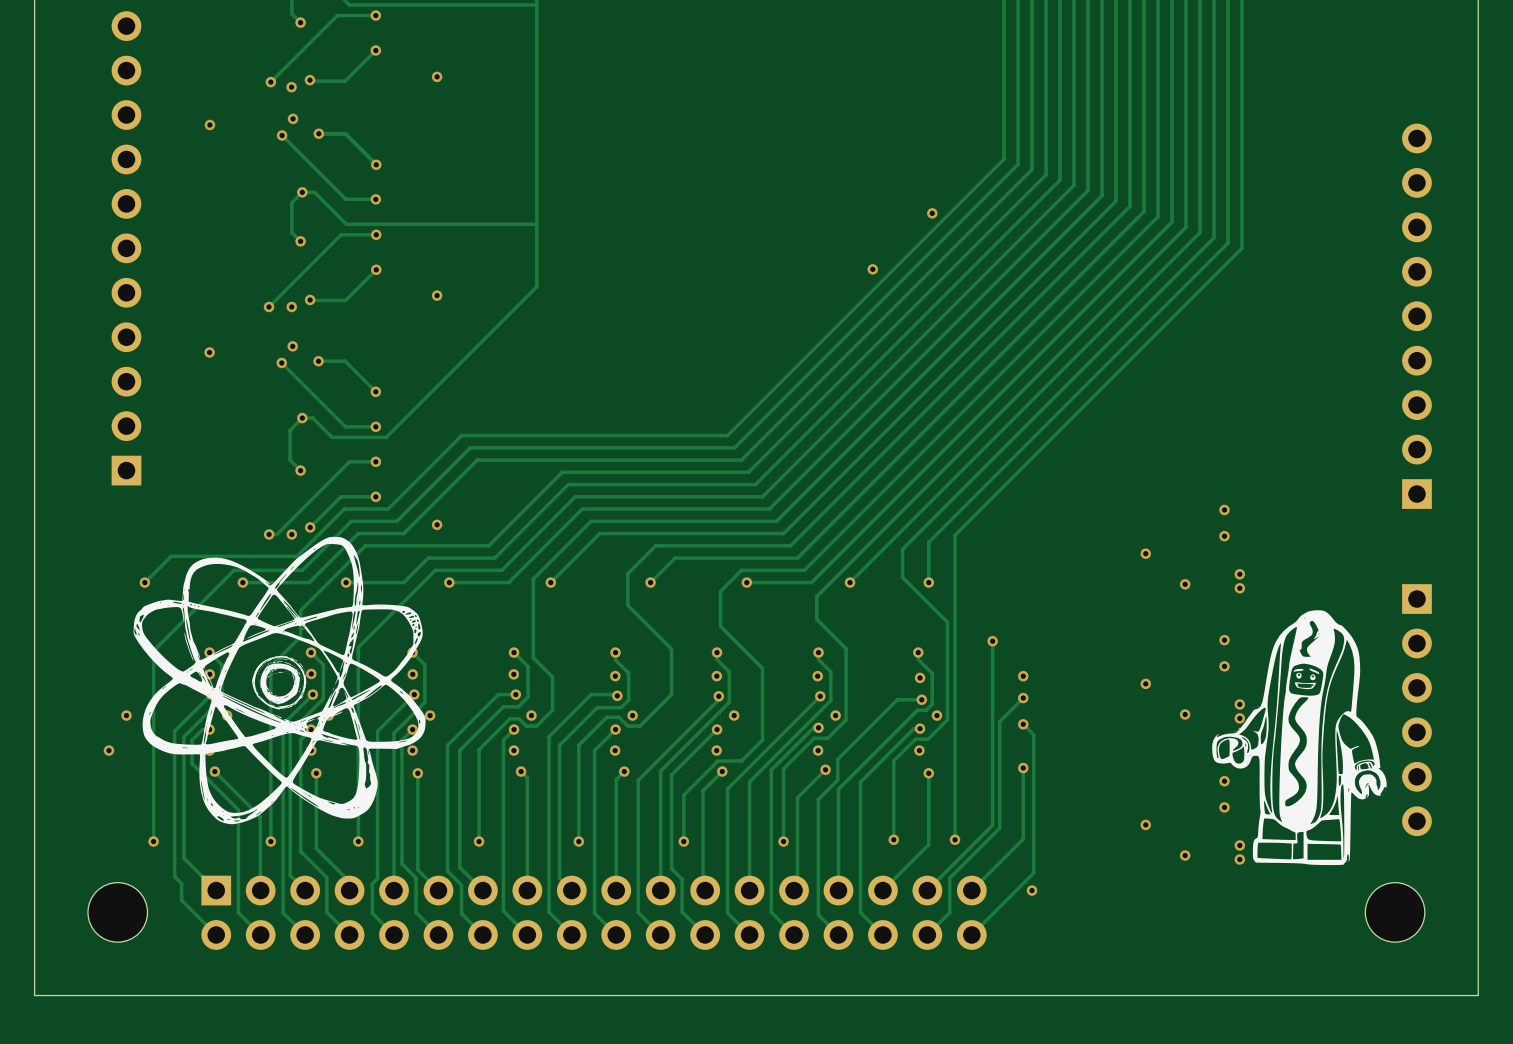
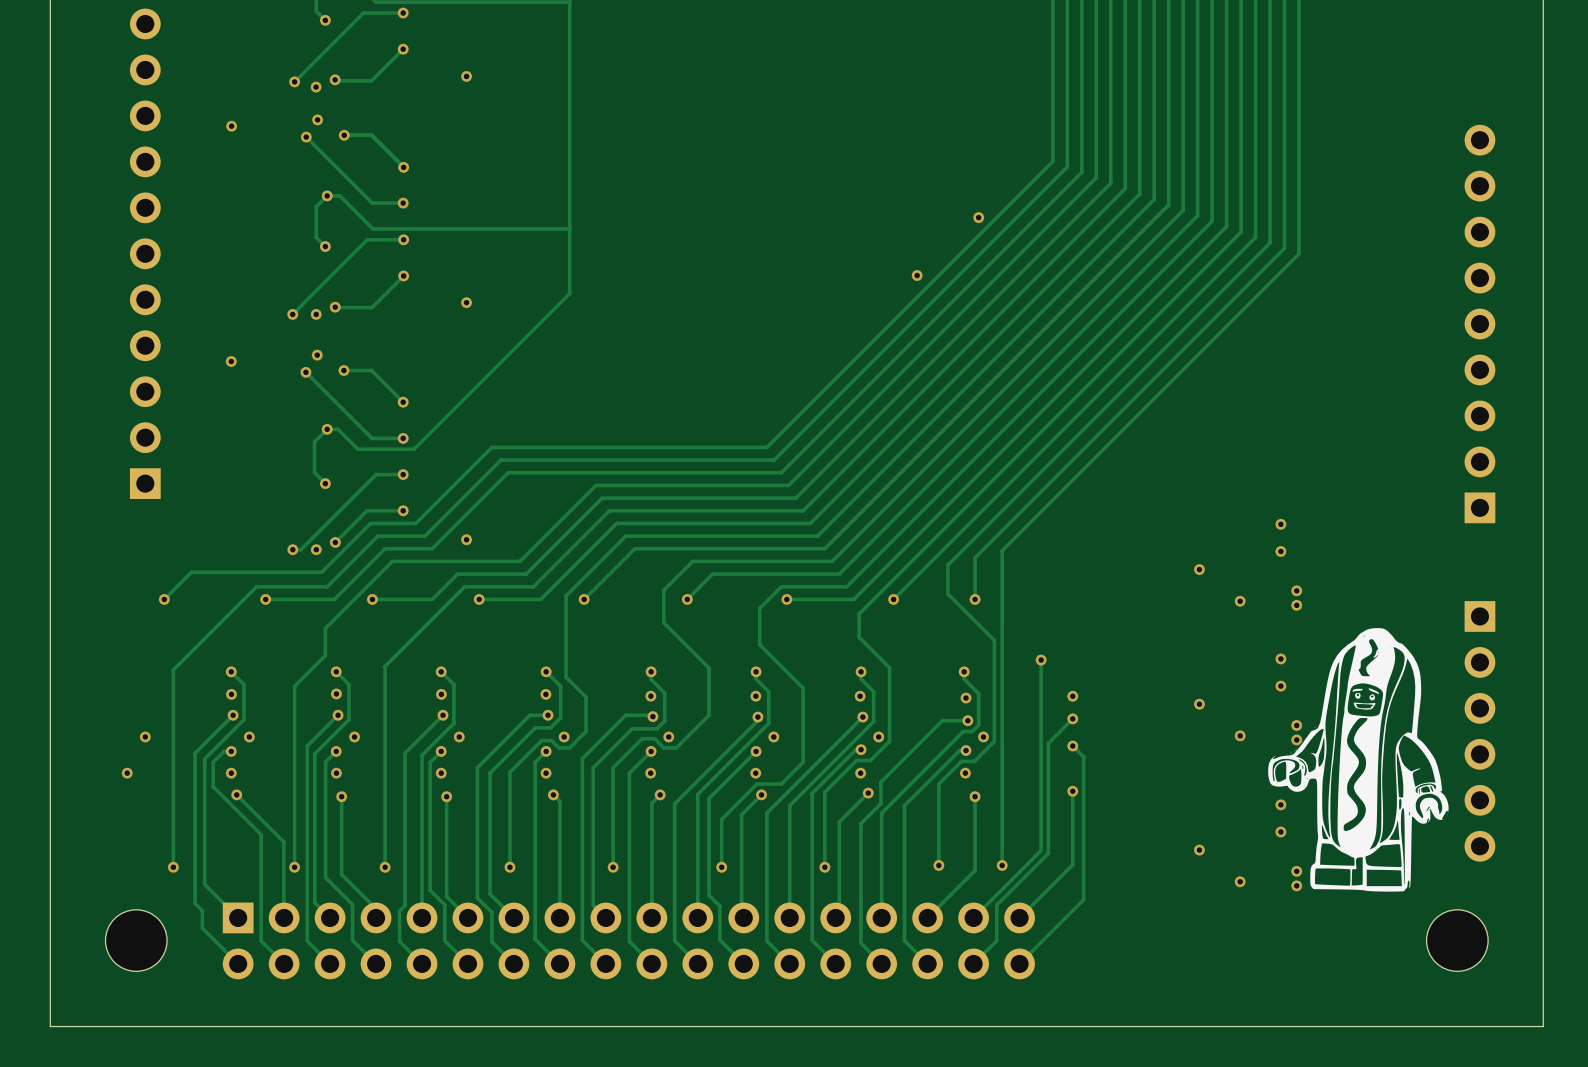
drawing: [133, 536, 426, 825] -> none
via: (1032, 890) -> none

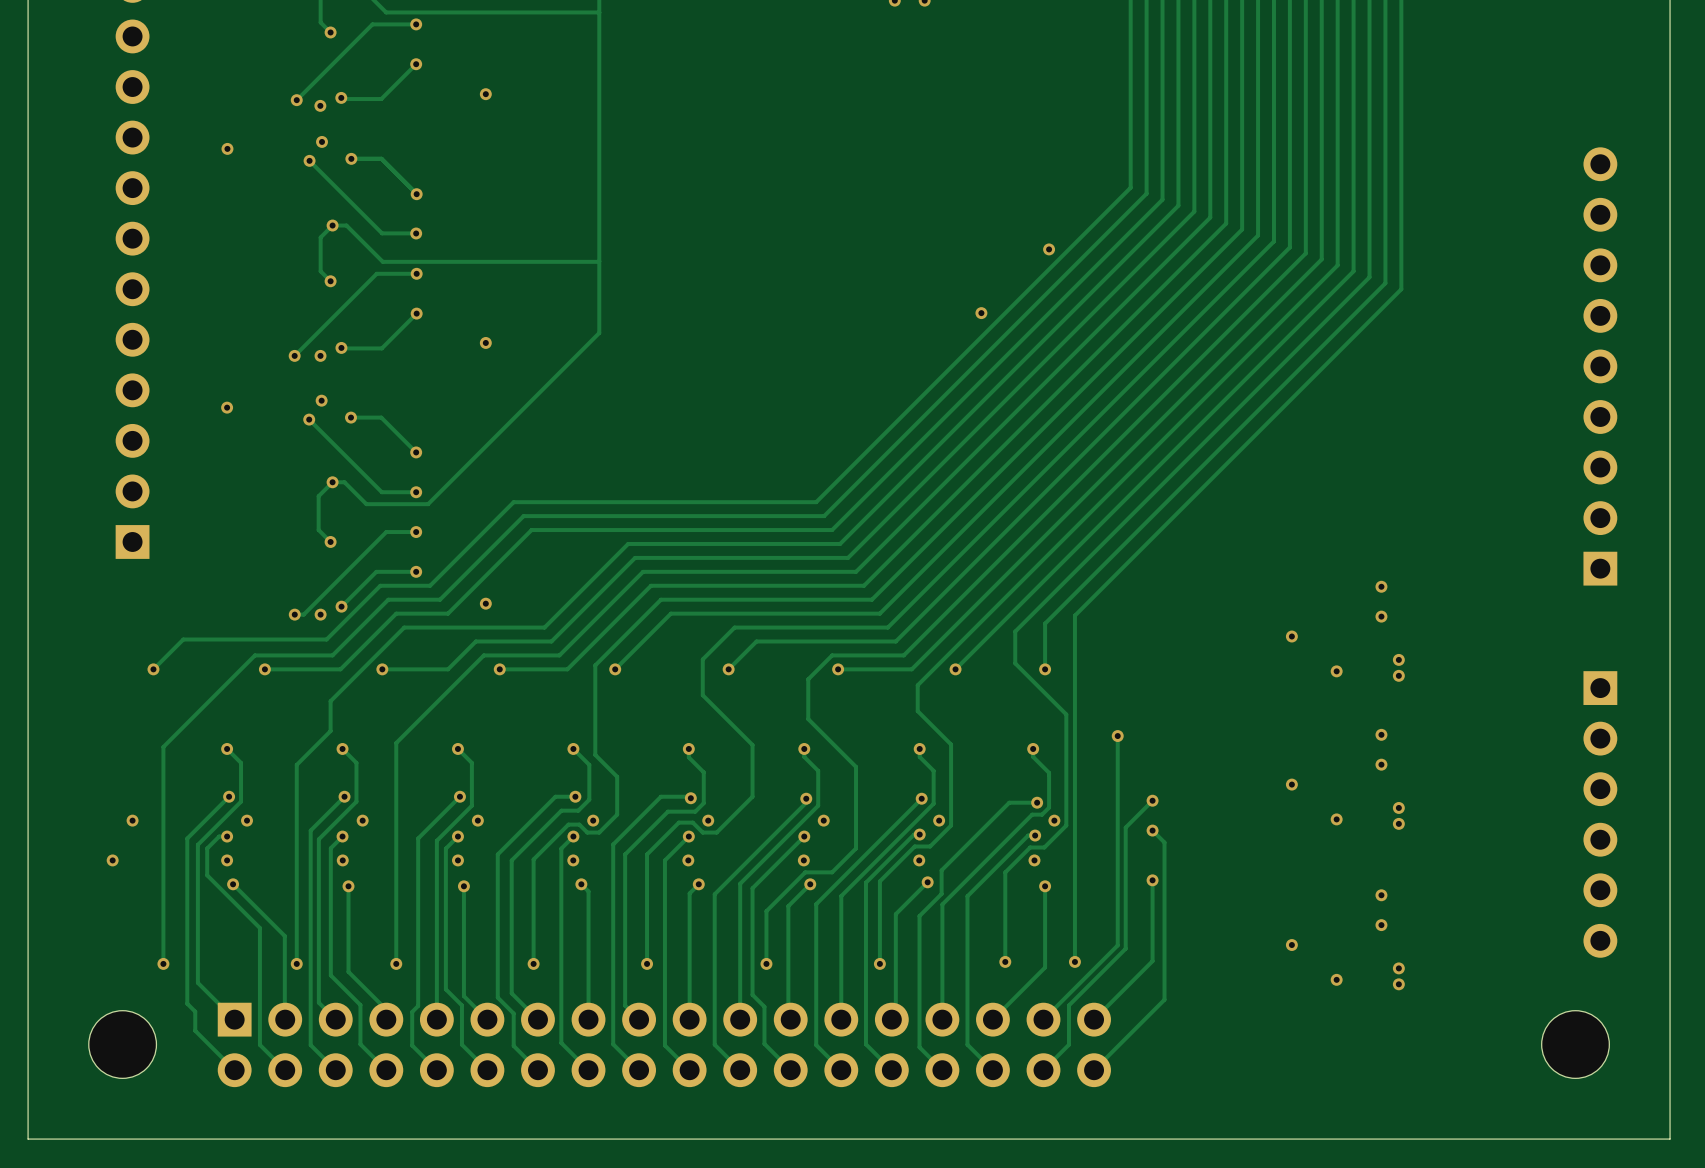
drawing: [1268, 628, 1449, 892] -> none
via: (336, 693) -> none
via: (231, 694) -> none
via: (441, 694) -> none
via: (545, 694) -> none
via: (650, 696) -> none
via: (755, 696) -> none
via: (860, 696) -> none
via: (1072, 696) -> none
via: (966, 698) -> none

